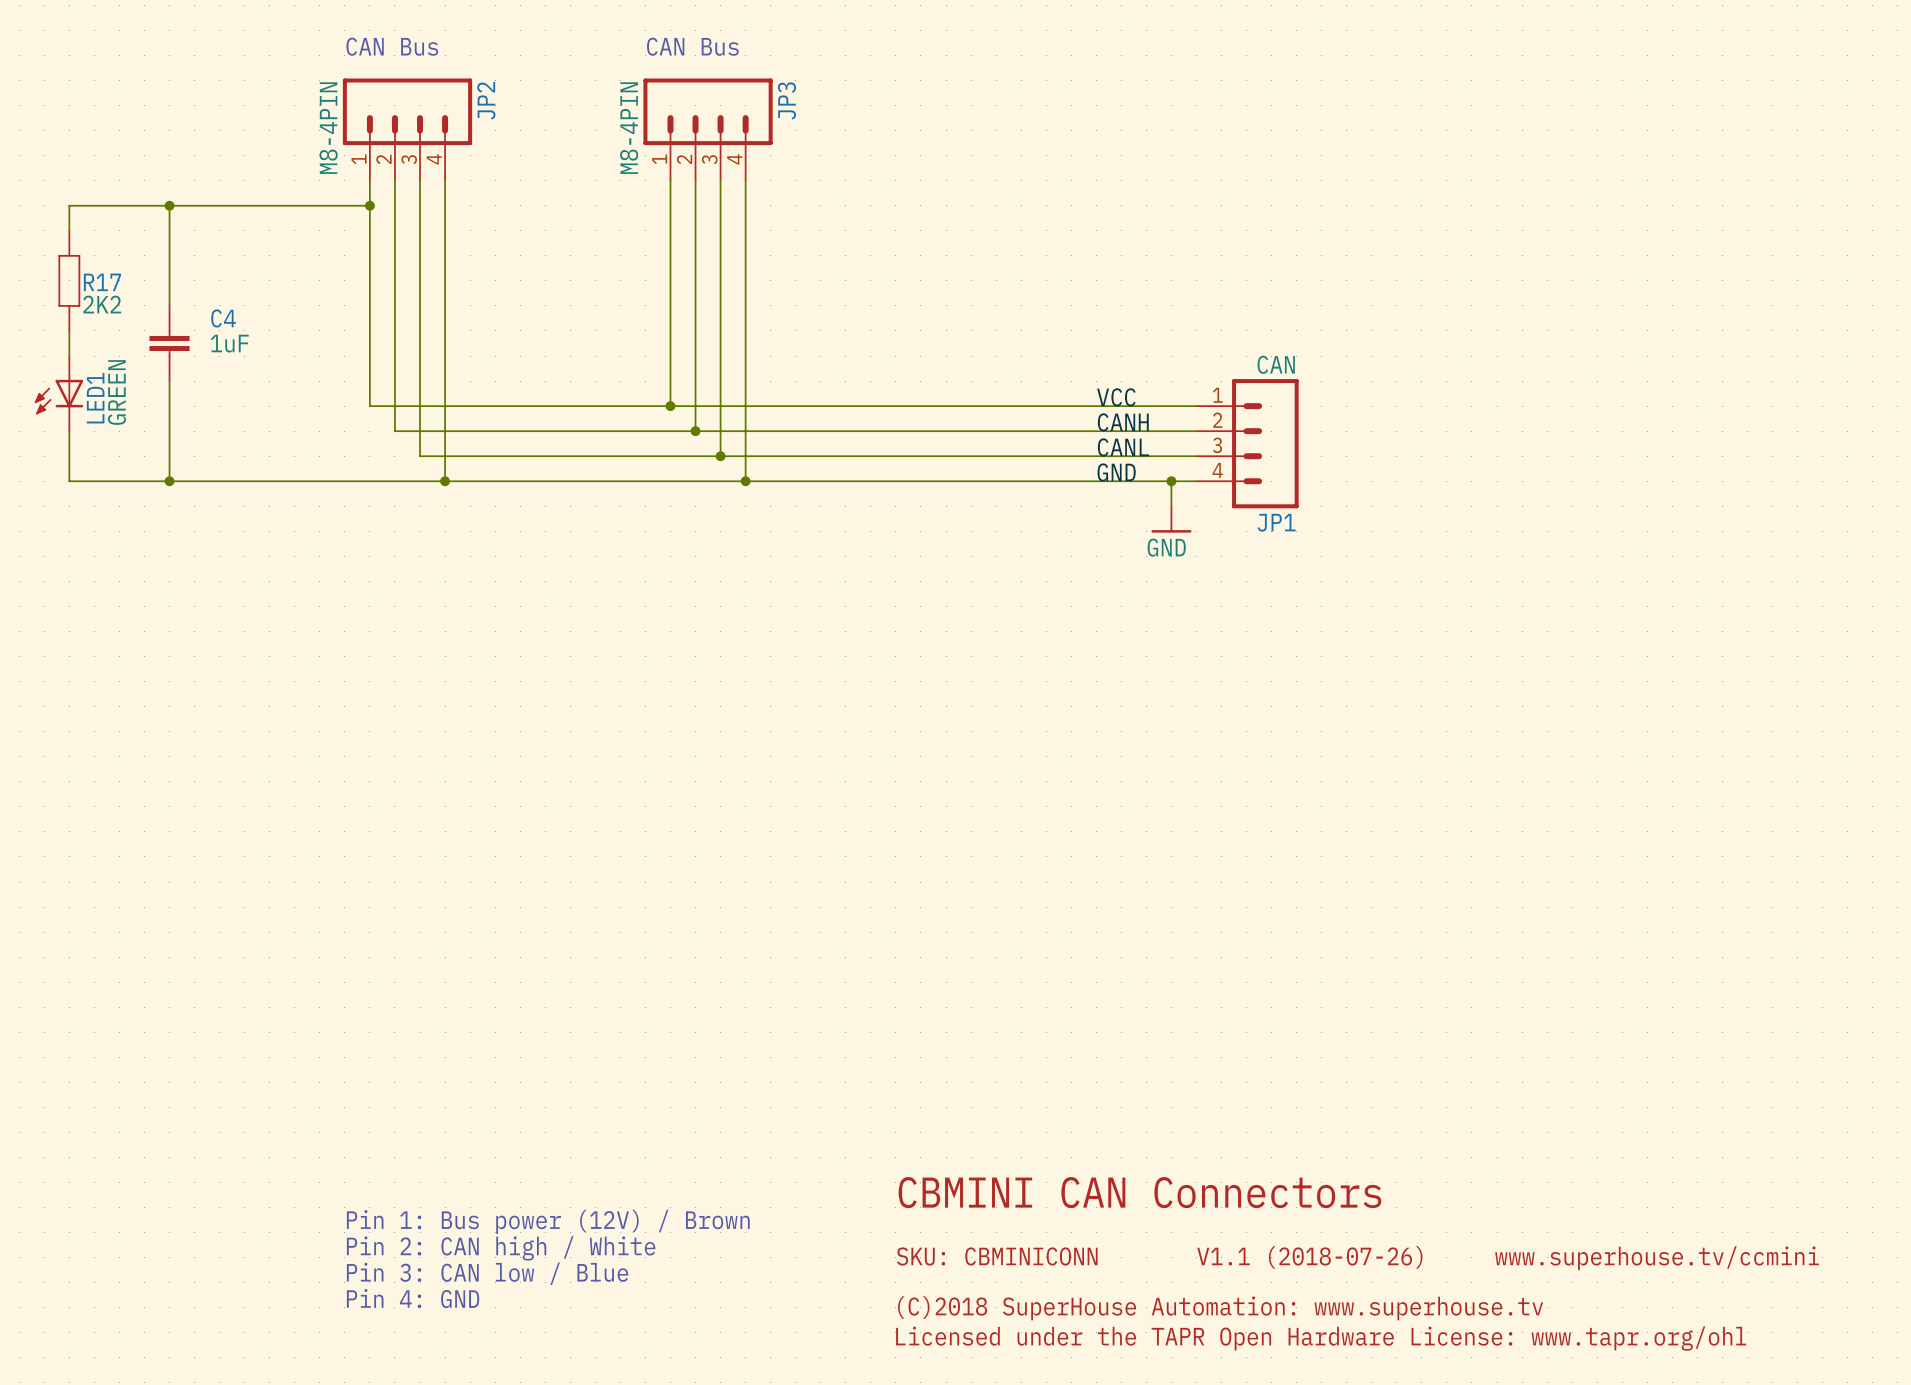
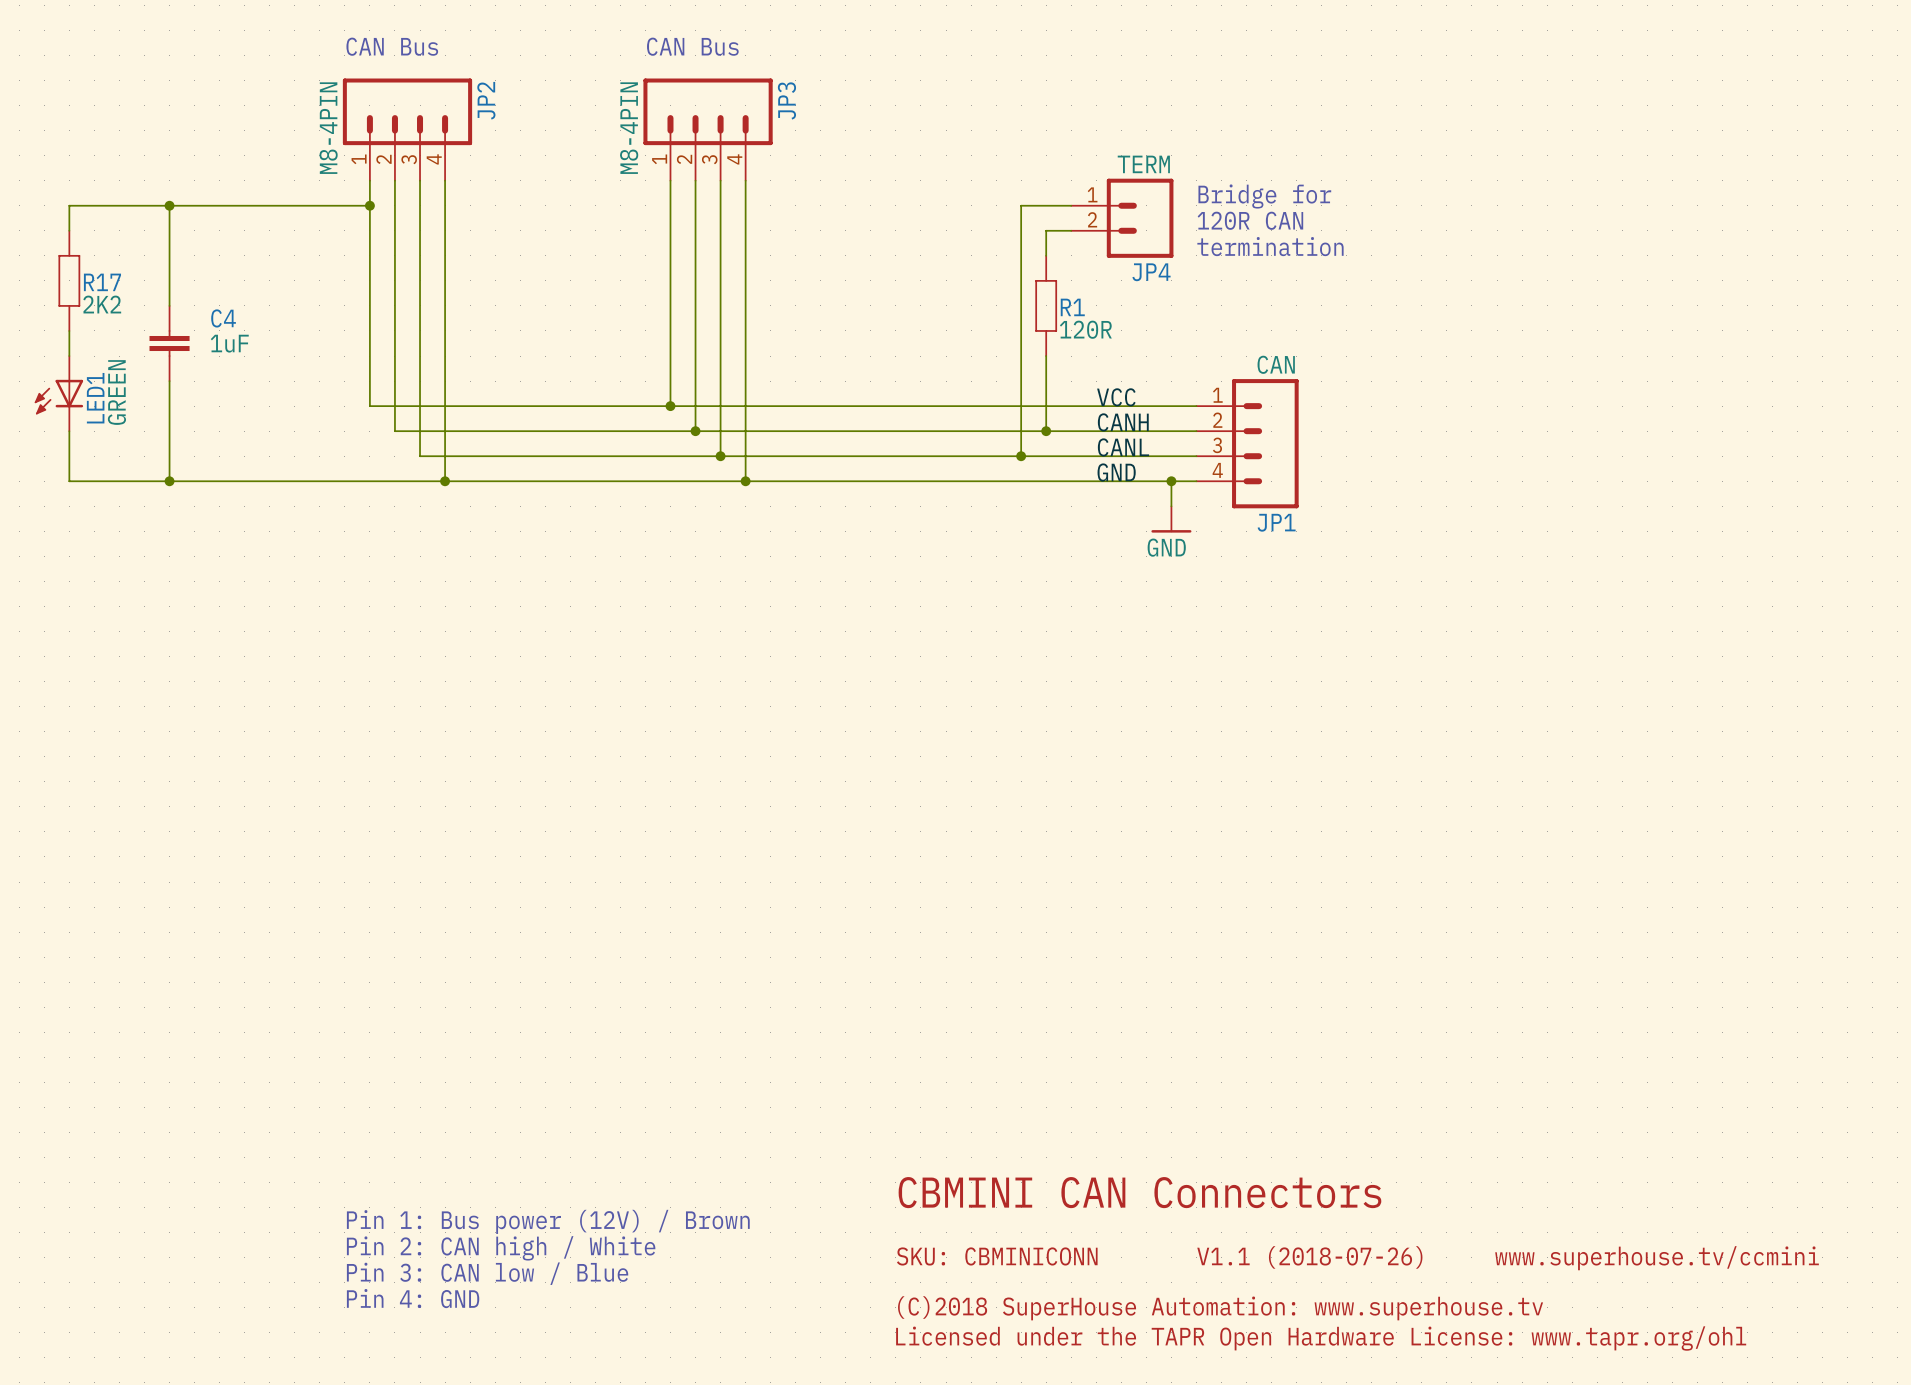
text: none -> Bridge for (1264, 196)
wire: none -> (1071, 205) (1021, 205) (1021, 456)
JP4: none -> TERM (1122, 218)
text: none -> 120R CAN (1250, 220)
wire: none -> (1071, 230) (1046, 230) (1046, 255)
text: none -> termination (1270, 246)
R1: none -> 120R (1046, 305)
wire: none -> (1046, 356) (1046, 431)
junction: none -> (1046, 431)
junction: none -> (1021, 456)

